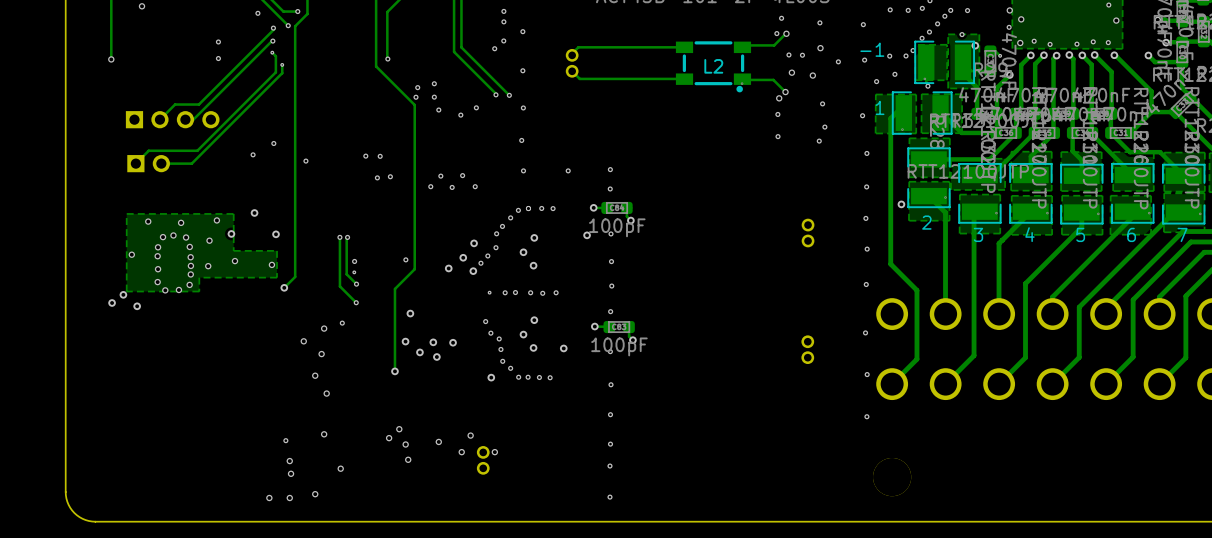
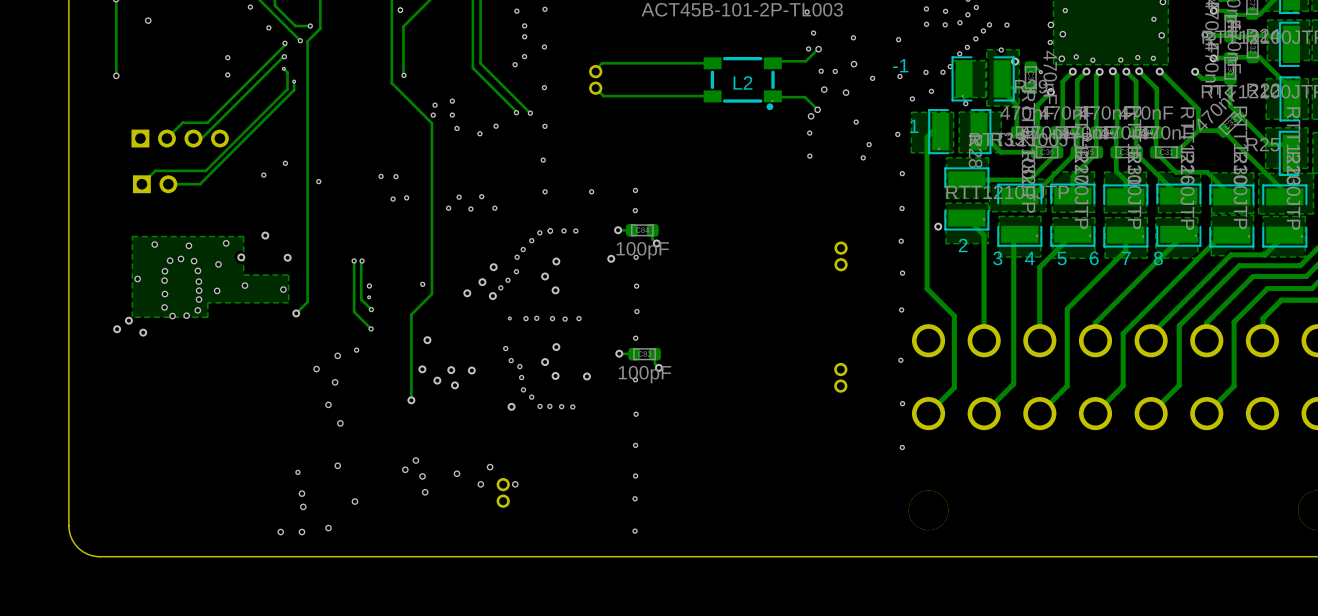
via: none -> (869, 144)
via: (824, 127) -> none
via: none -> (863, 157)
via: (819, 141) -> none

